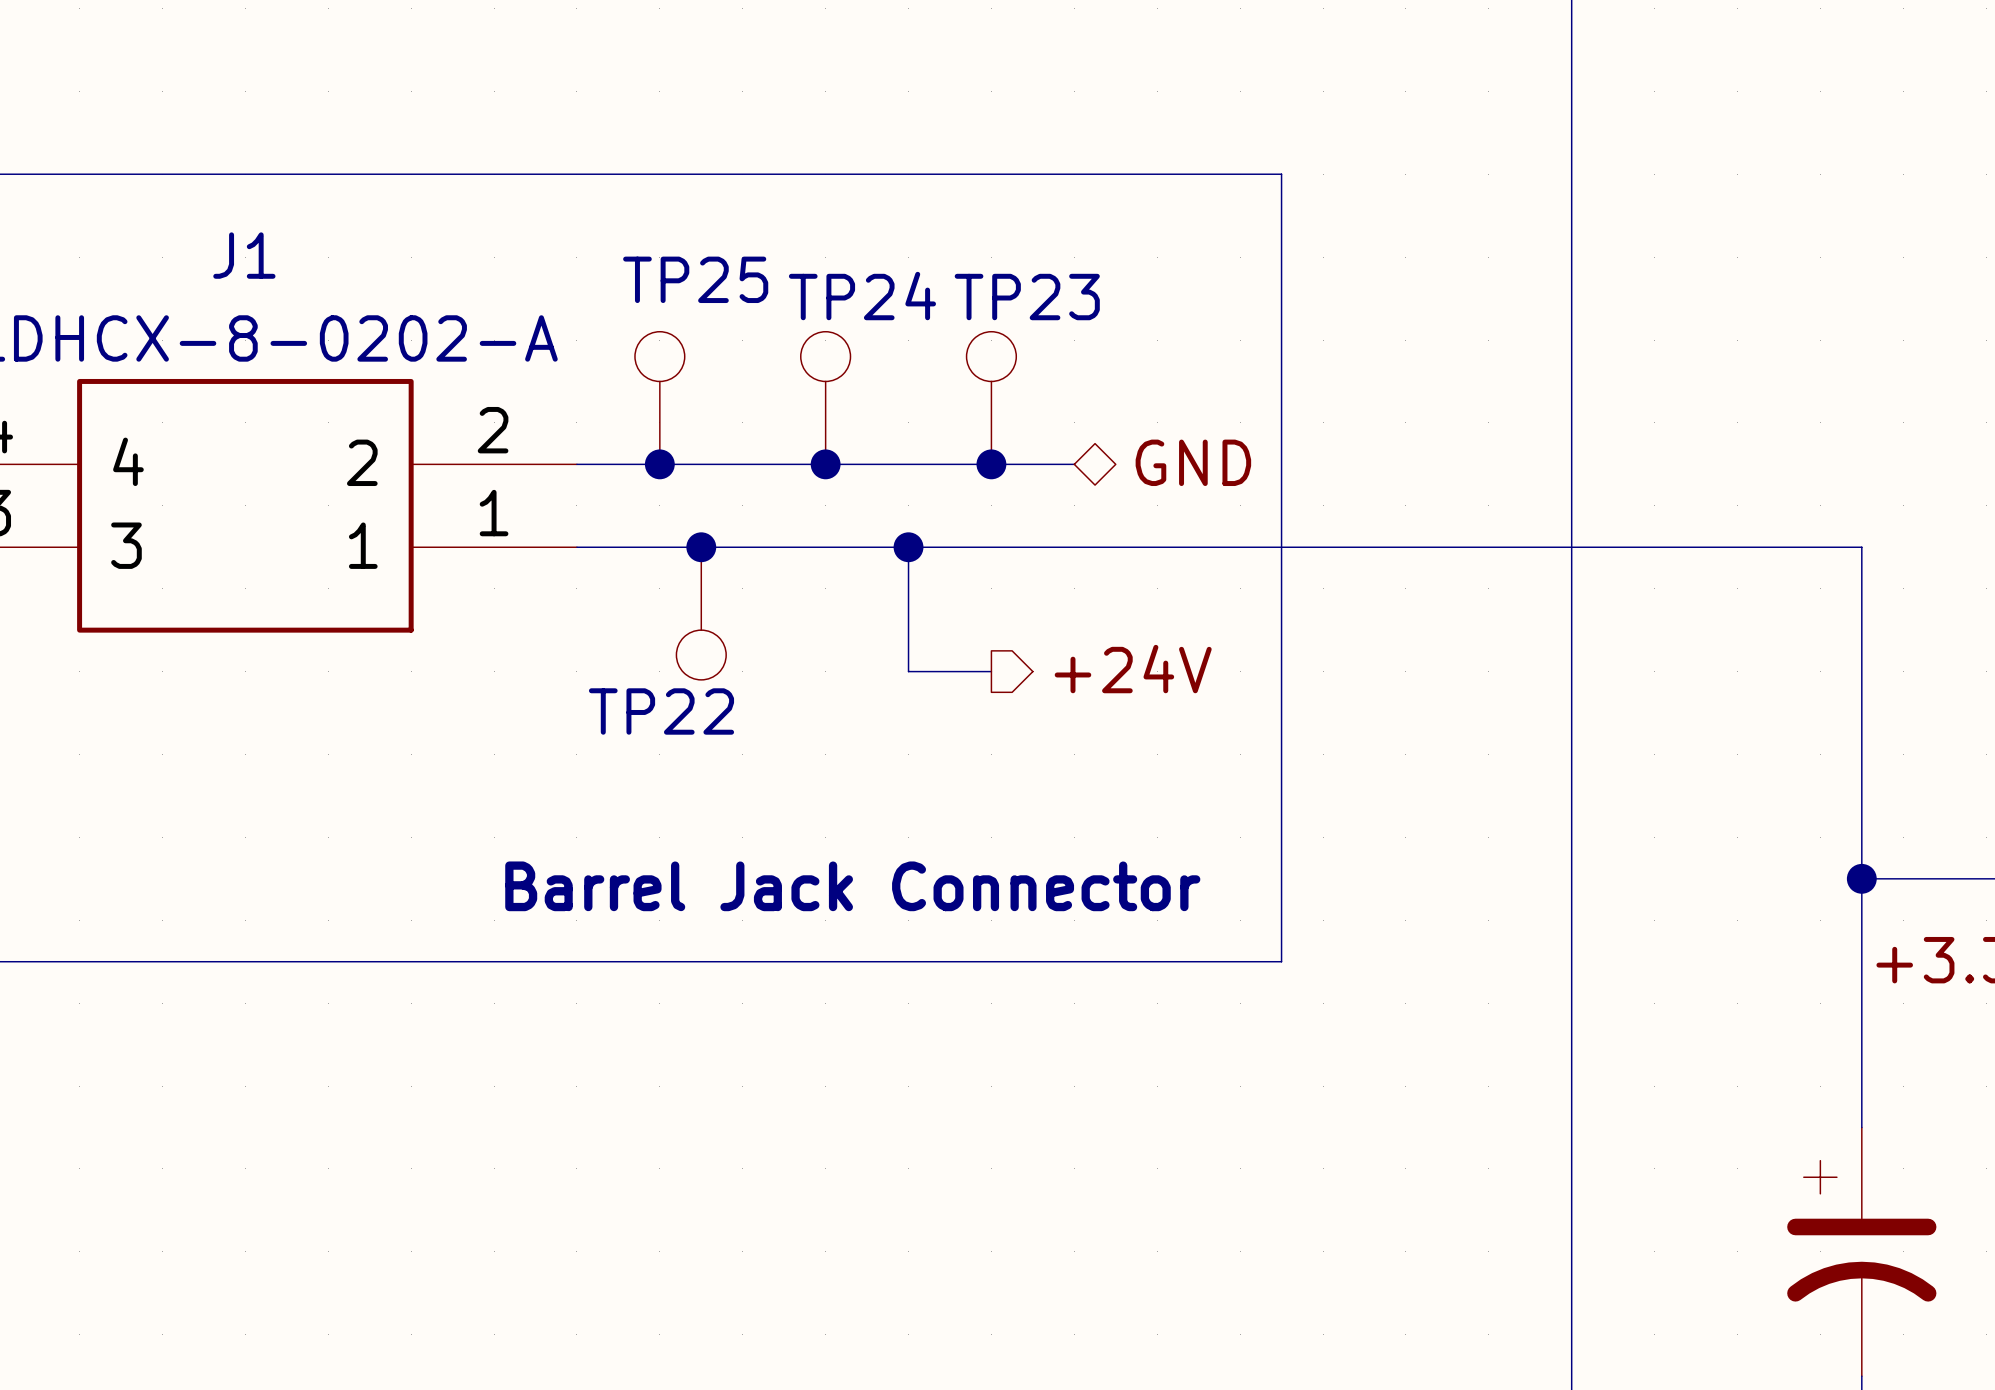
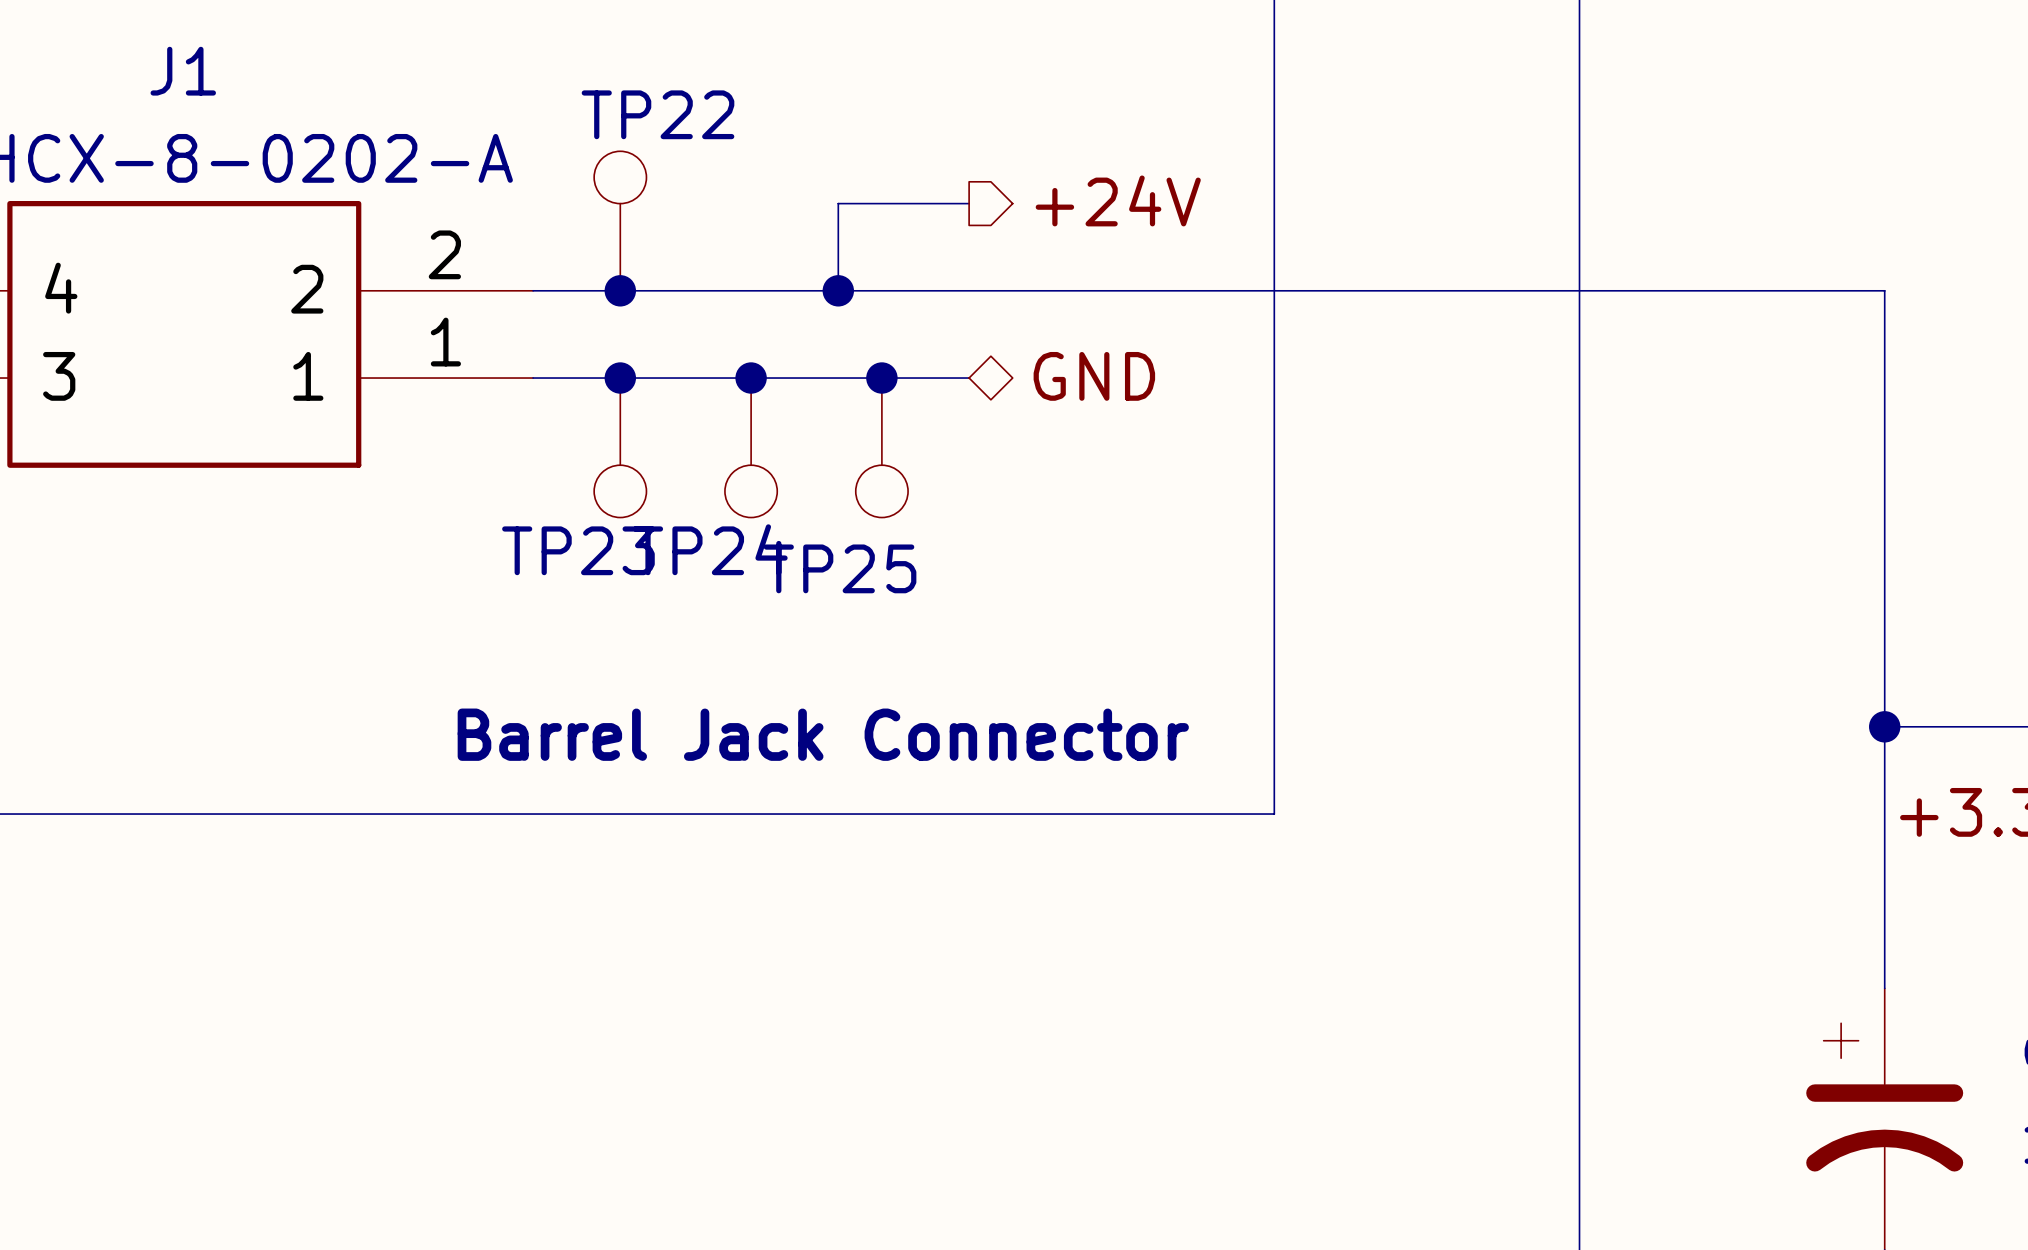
TP25 name: TP25 (695, 279) -> TP22 (658, 114)
TP24 rotation: 0° (825, 356) -> 180° (751, 491)
TP23 rotation: 0° (991, 356) -> 180° (620, 491)
wire: none -> (969, 203) (838, 203) (838, 290)
TP24 position: (825, 398) -> (751, 447)
TP23 position: (991, 398) -> (620, 447)
hierarchical label position: GND (1193, 462) -> GND (1094, 376)
junction position: (825, 464) -> (838, 290)
junction: (991, 464) -> none
junction: none -> (620, 378)
junction: (701, 547) -> none
junction: none -> (751, 378)
wire: (908, 547) (908, 671) (991, 671) -> none
wire: (991, 547) (1861, 547) -> (1056, 290) (1884, 290) (1884, 378)
TP22: (701, 613) -> none
TP25: none -> (881, 447)
hierarchical label position: +24V (1133, 669) -> +24V (1118, 200)

